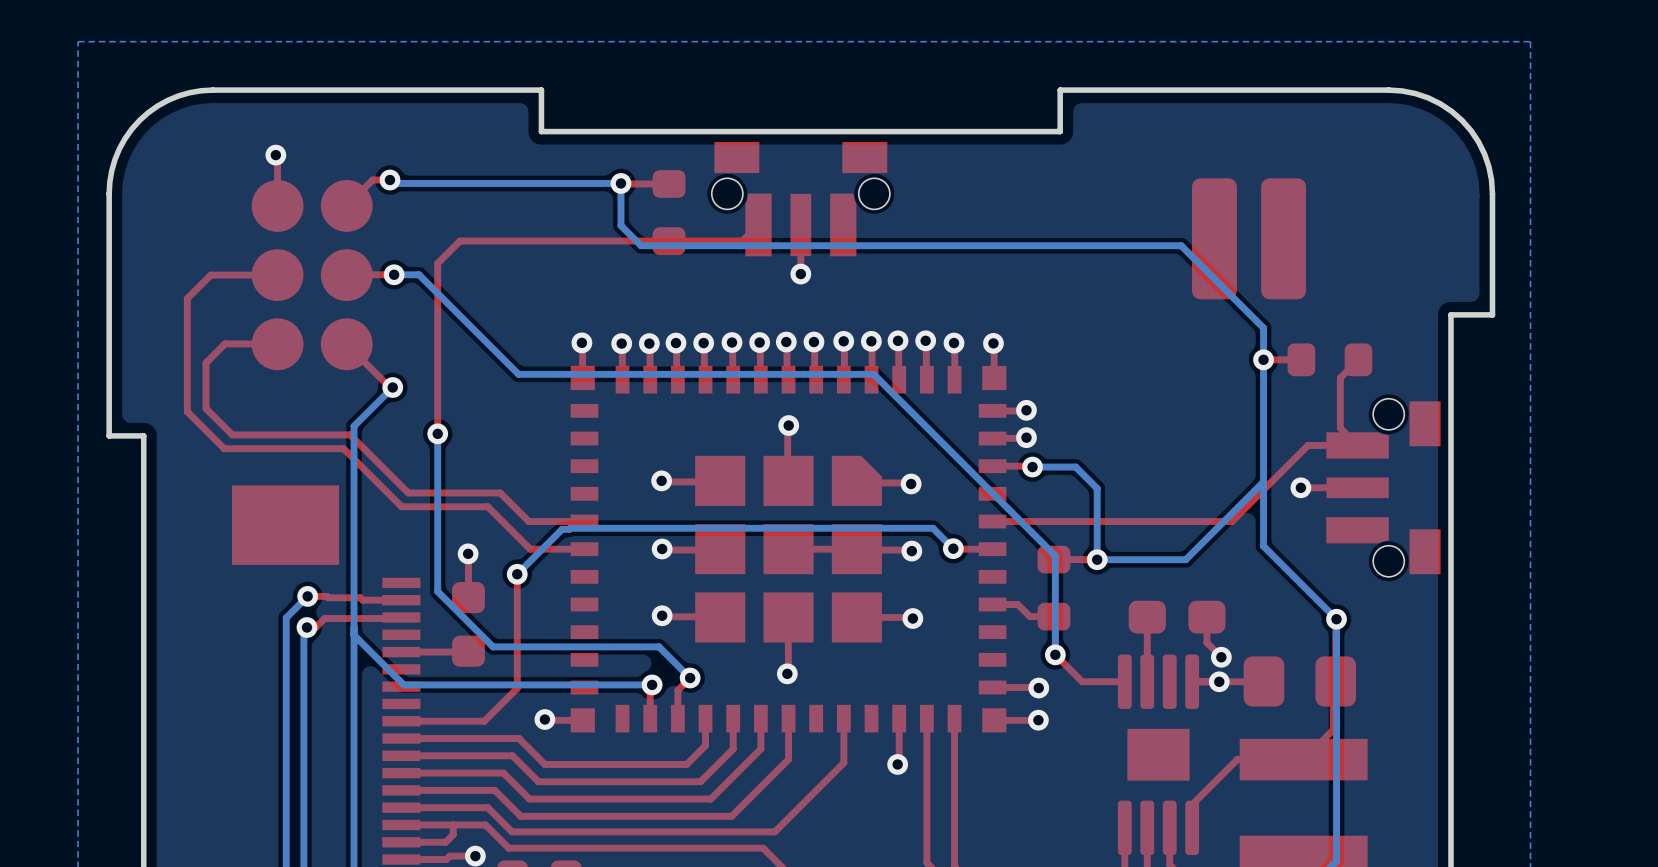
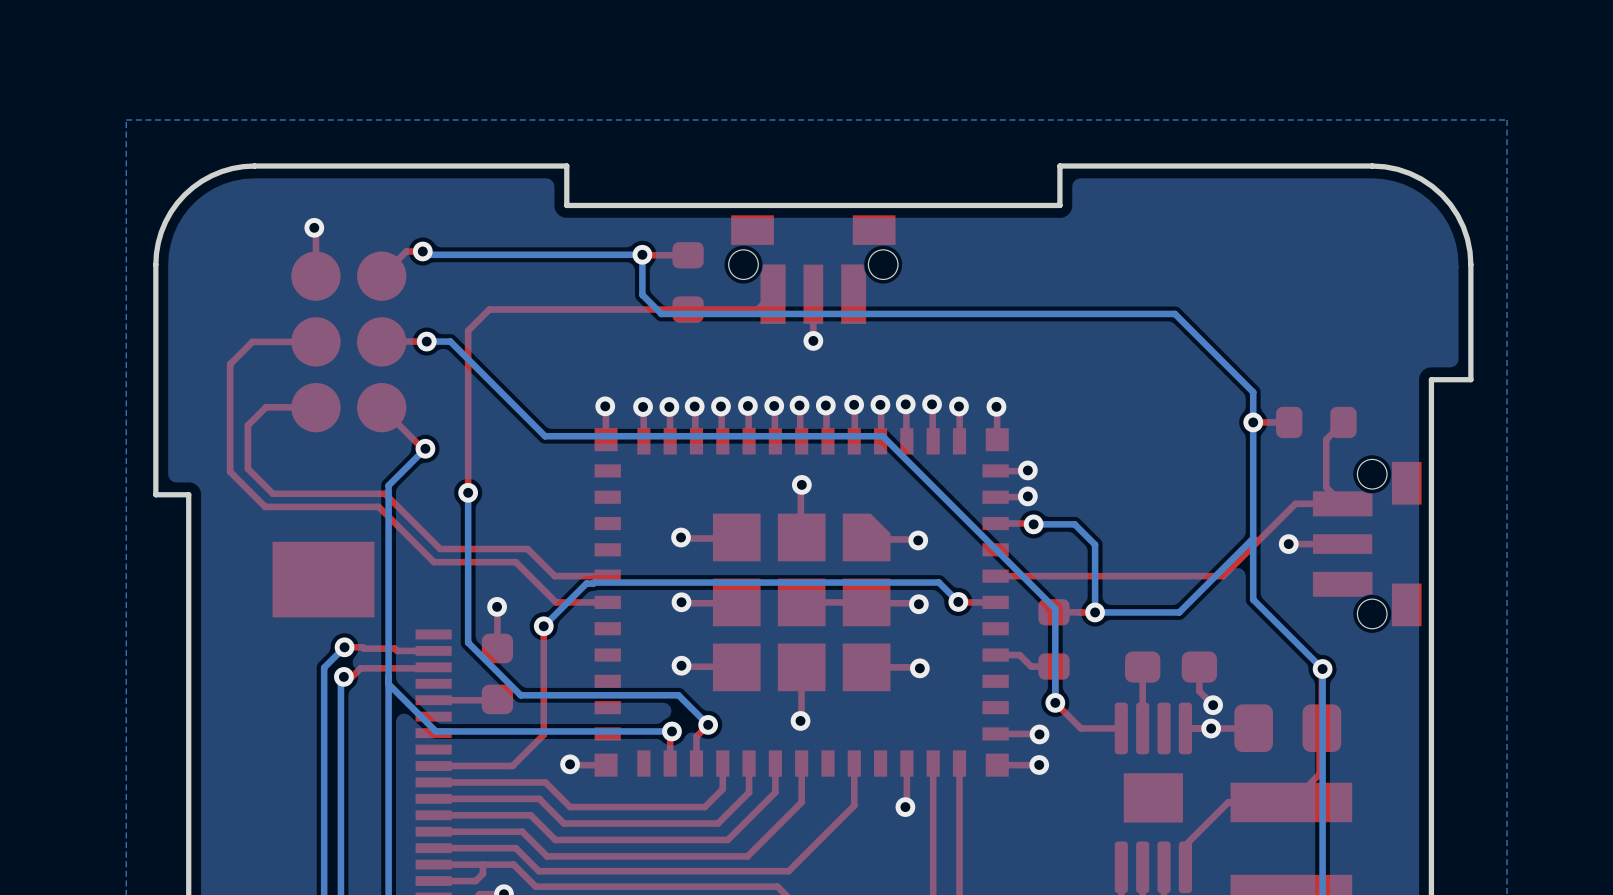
part: (1249, 238) -> none

